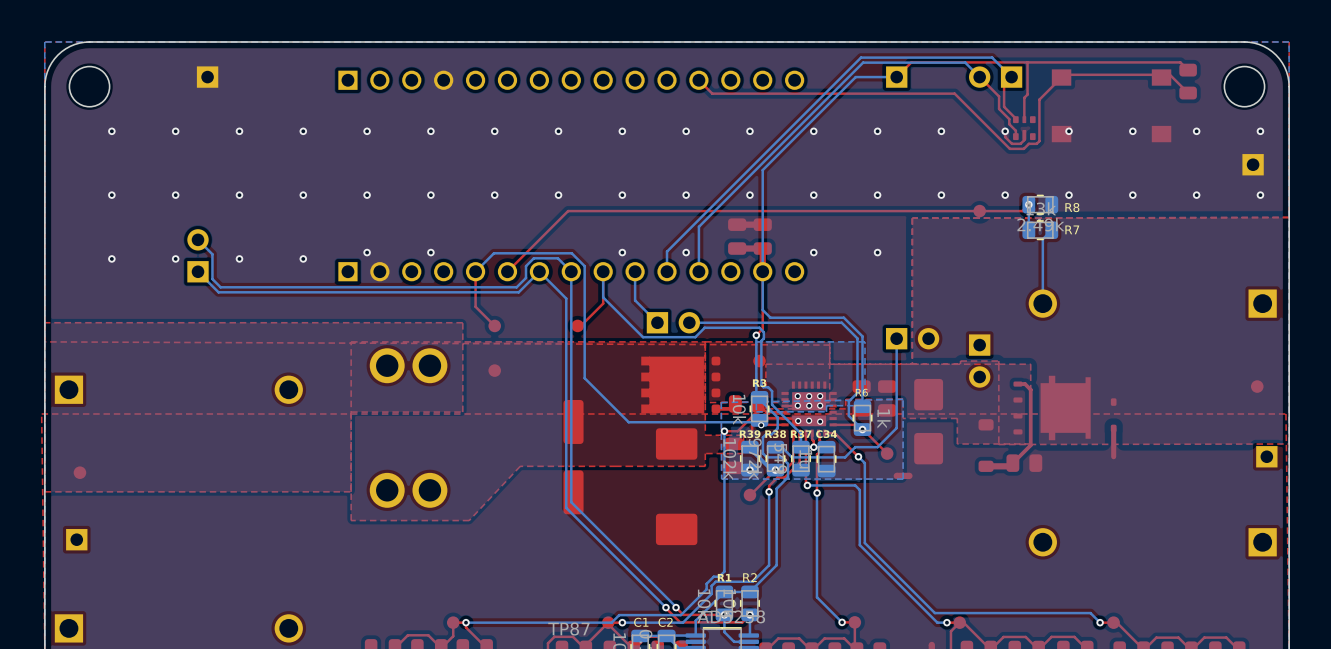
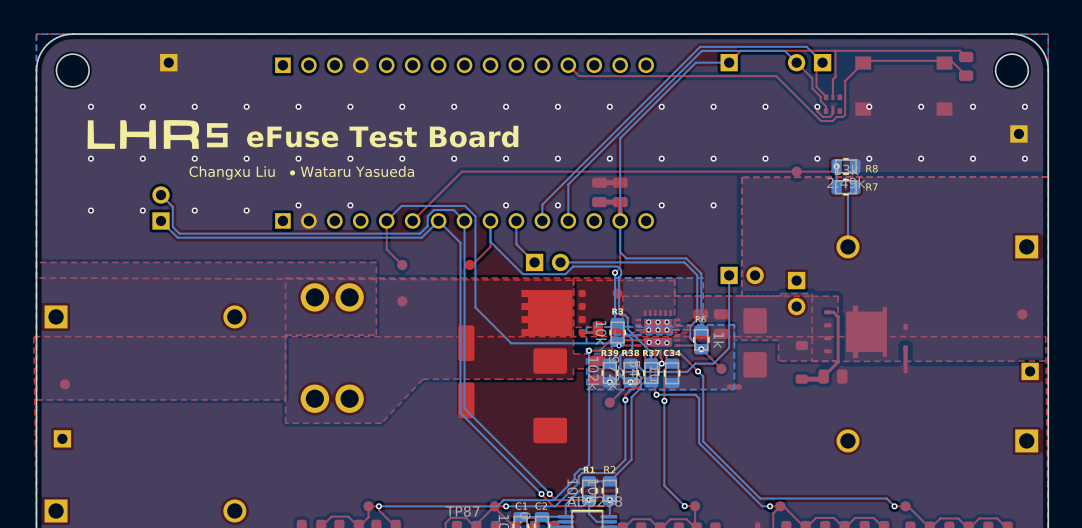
drawing: none -> [87, 120, 228, 149]
text: none -> eFuse Test Board (382, 136)
drawing: none -> [289, 170, 296, 176]
text: none -> Wataru Yasueda (357, 171)
text: none -> Changxu Liu (232, 172)

